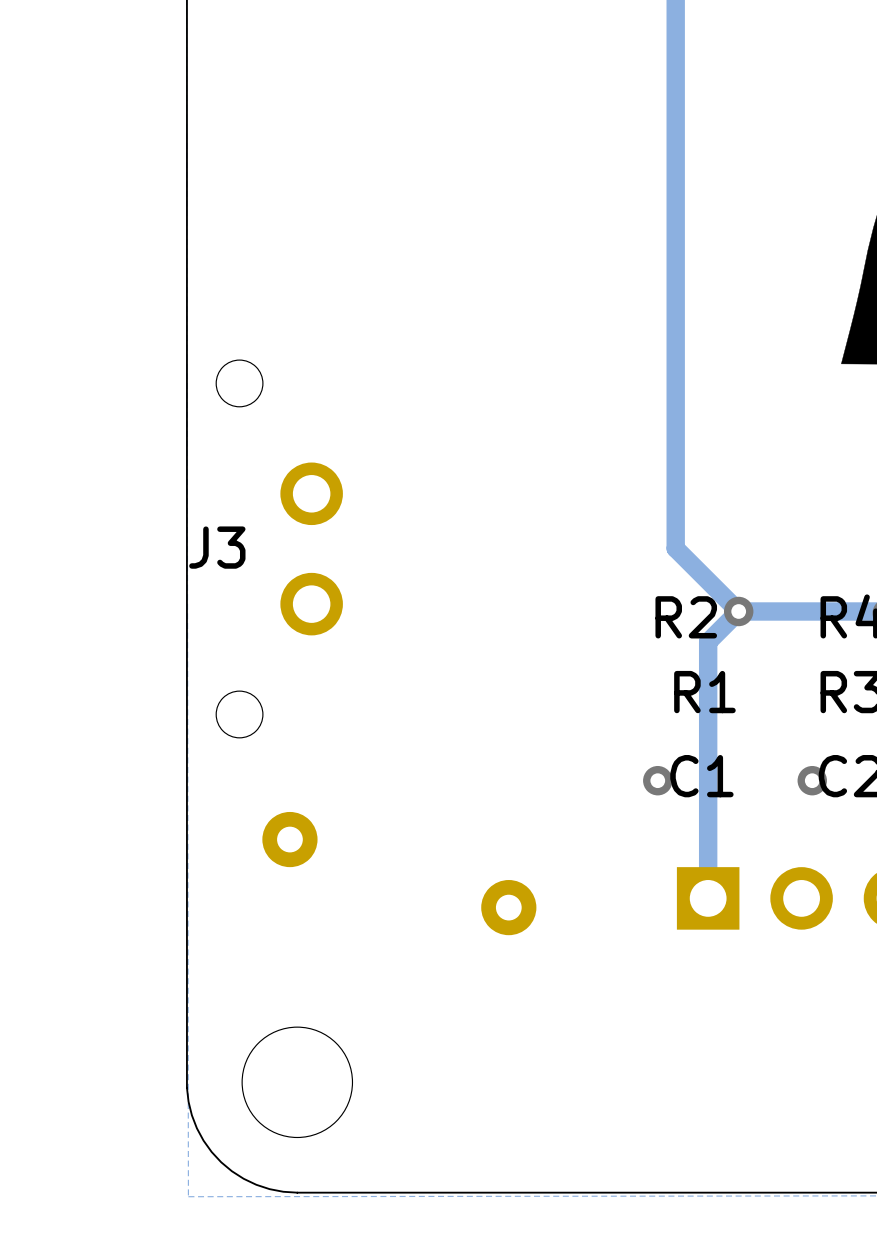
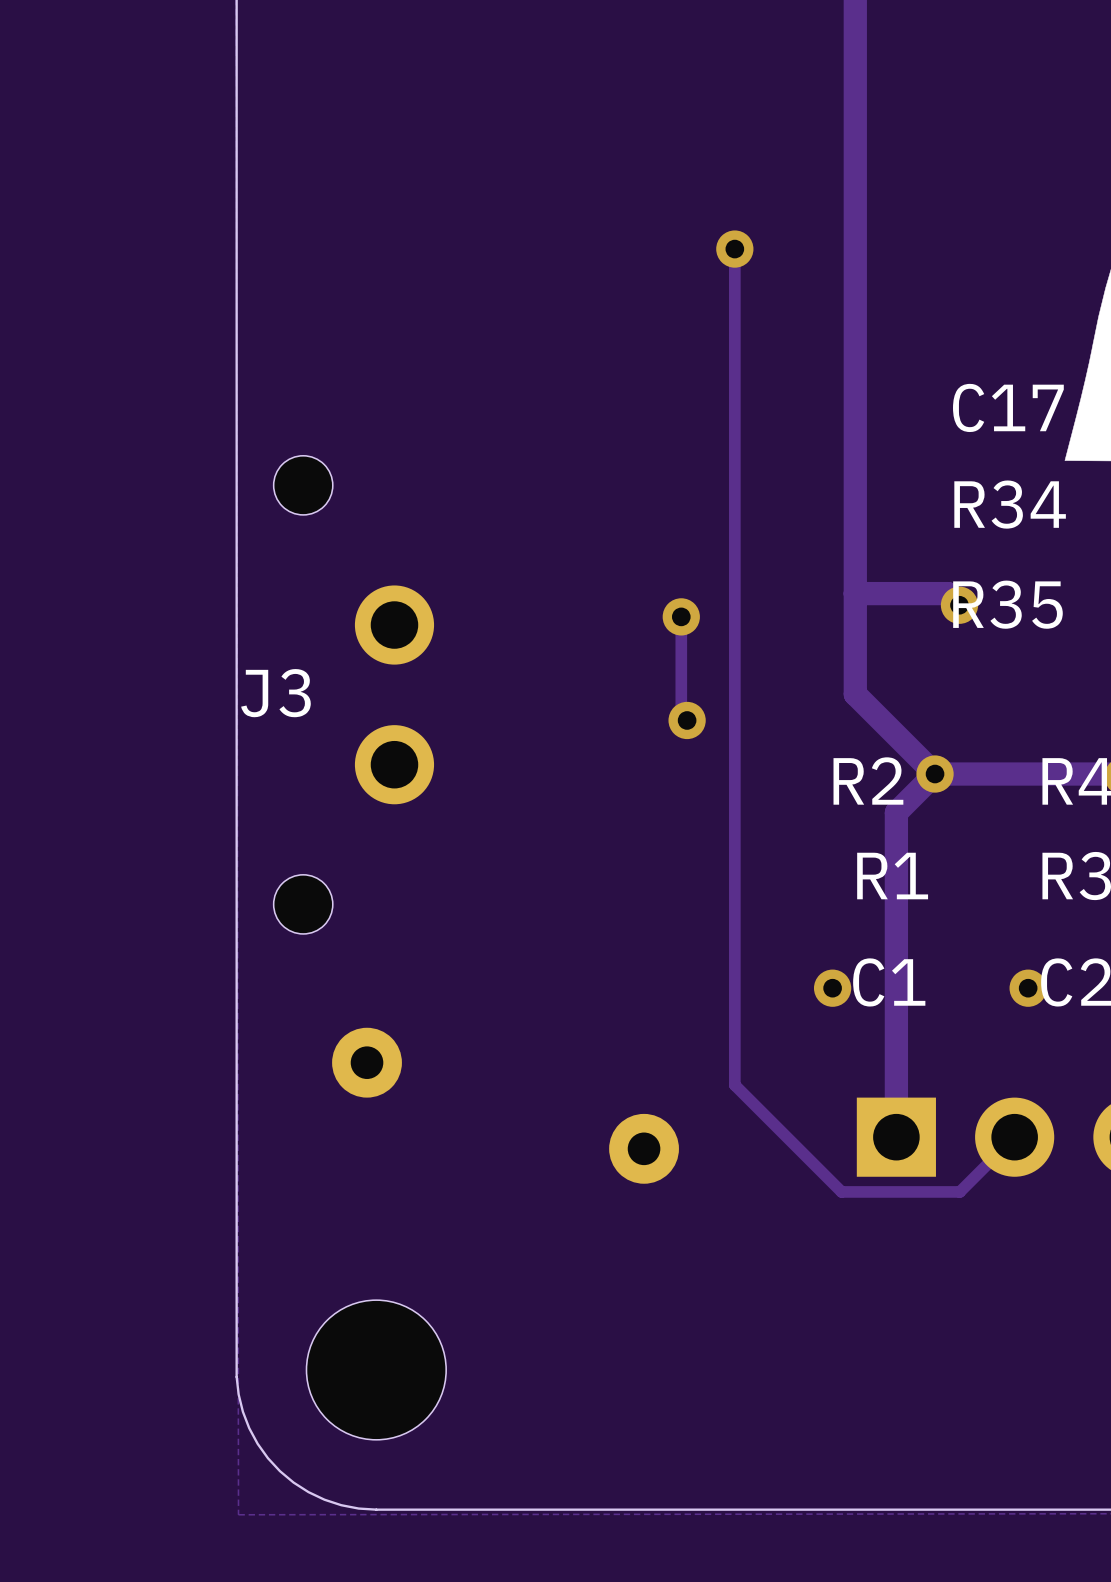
track: none -> (734, 249) (734, 1085) (841, 1191) (959, 1191) (1014, 1137)
via: none -> (734, 249)
C17: none -> (1008, 407)
R34: none -> (1010, 504)
track: none -> (855, 593) (947, 593) (959, 605)
R35: none -> (1007, 604)
via: none -> (959, 605)
track: none -> (681, 616) (681, 714) (687, 720)
via: none -> (681, 616)
via: none -> (687, 720)

